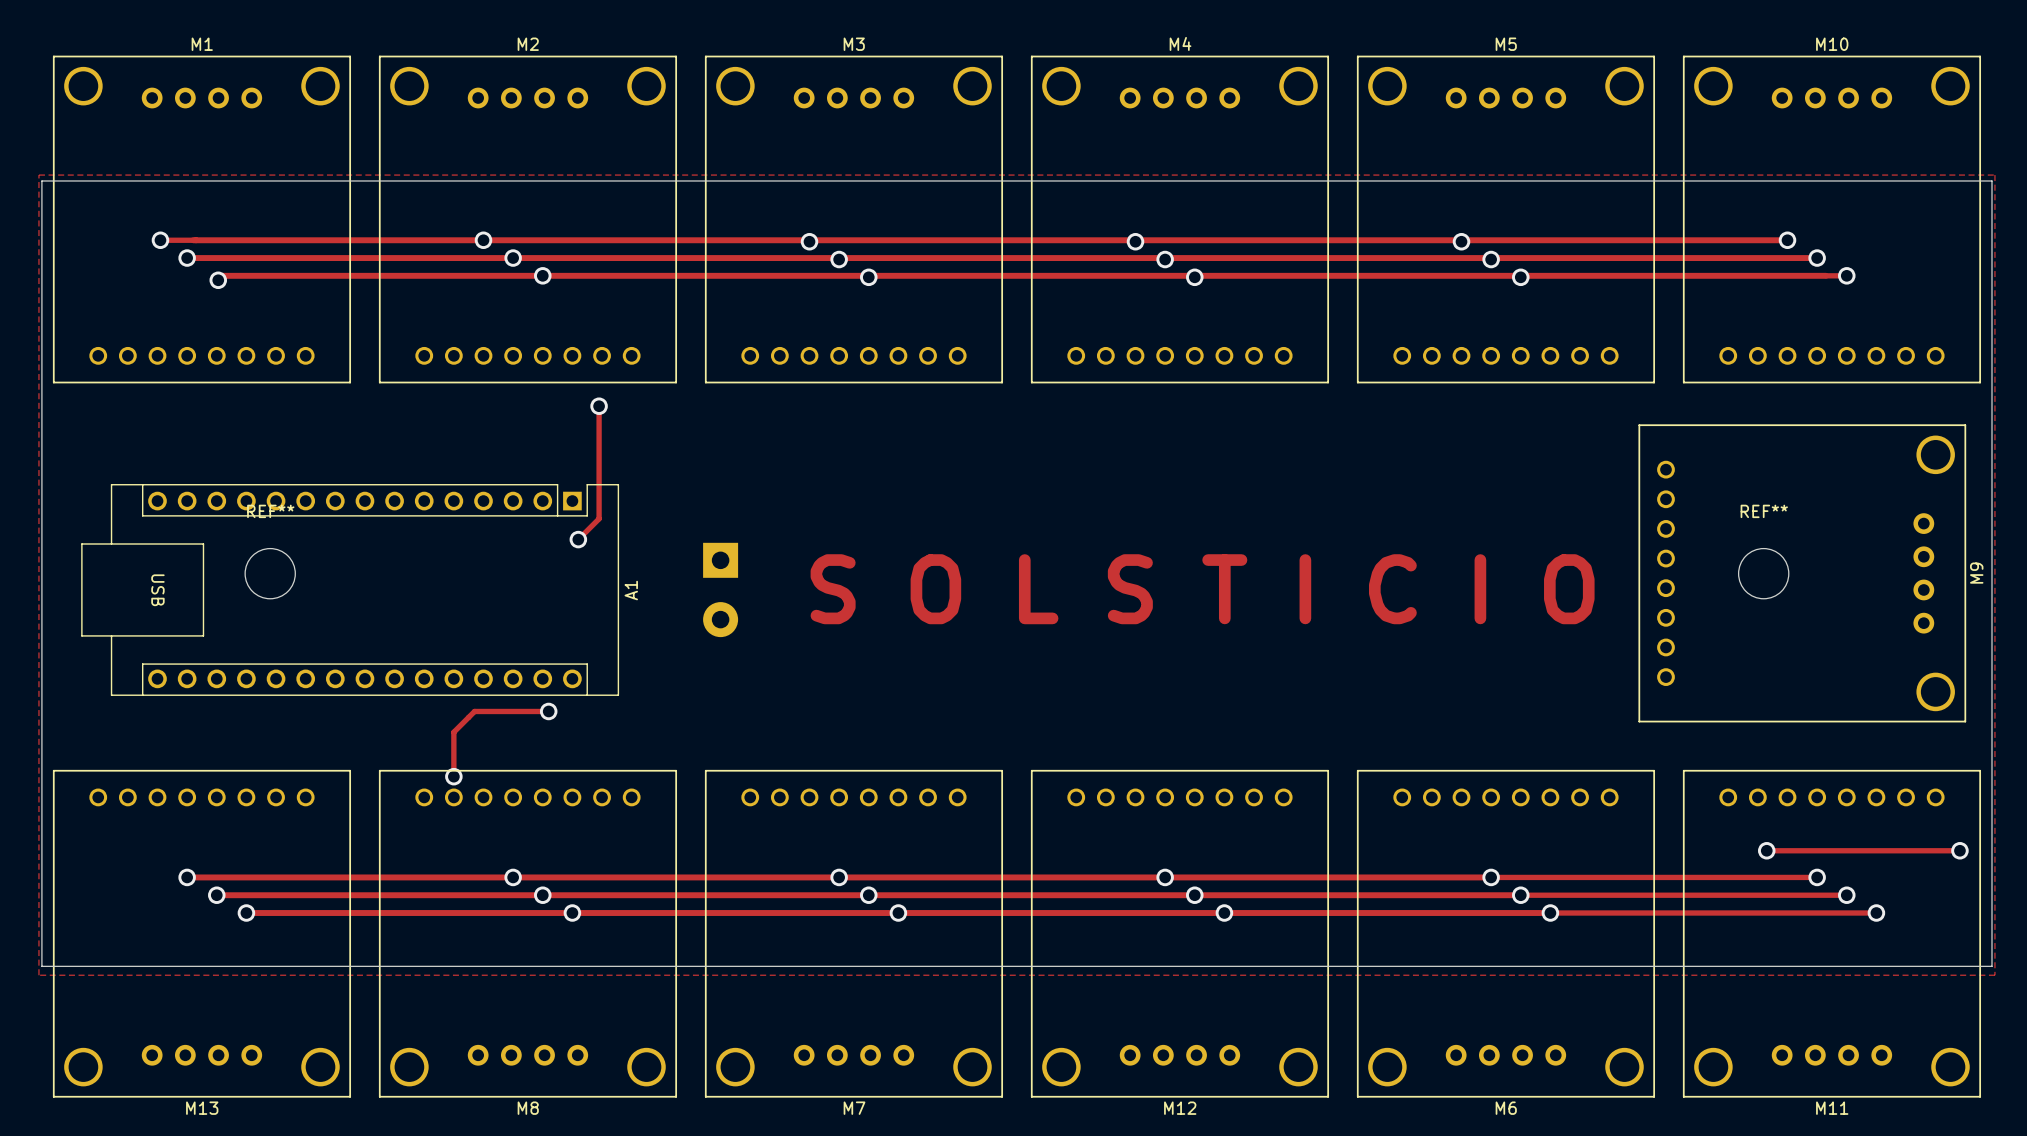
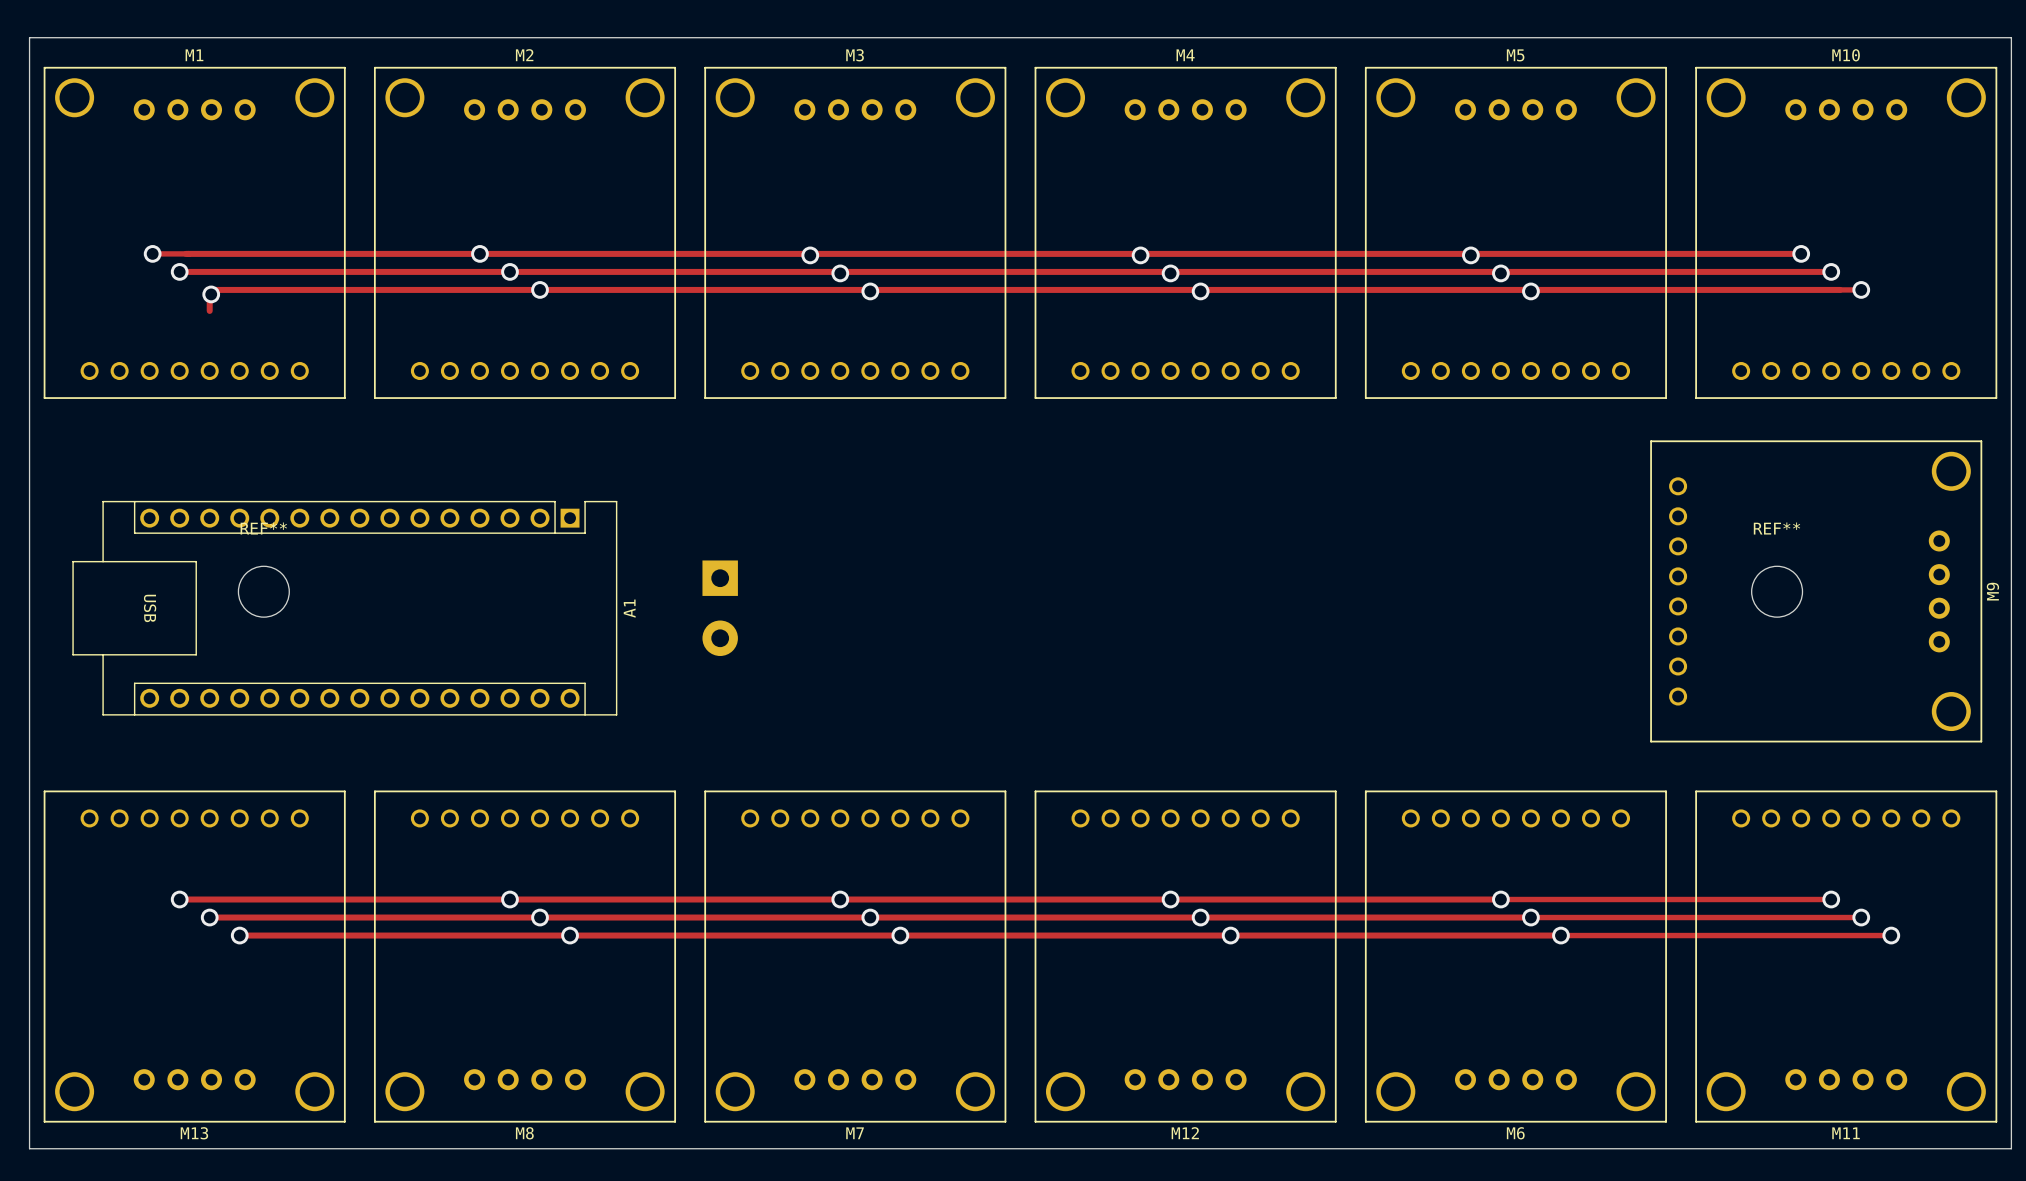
zone outline: (38, 175) (1994, 175) (1994, 975) (38, 975) (38, 175) -> none
board edge: (41, 180) (1991, 180) (1991, 966) (41, 966) (41, 180) -> (29, 37) (29, 1148) (2011, 1148) (2011, 37) (29, 37)
track: none -> (209, 295) (209, 310)
track: (599, 406) (599, 518) (578, 539) -> none
via: (599, 406) -> none
via: (578, 539) -> none
text: S O L S T I C I O (1202, 589) -> none
track: (548, 711) (474, 711) (453, 732) (453, 776) -> none
via: (548, 711) -> none
via: (453, 776) -> none
track: (1766, 850) (1959, 850) -> none
via: (1766, 850) -> none
via: (1959, 850) -> none

